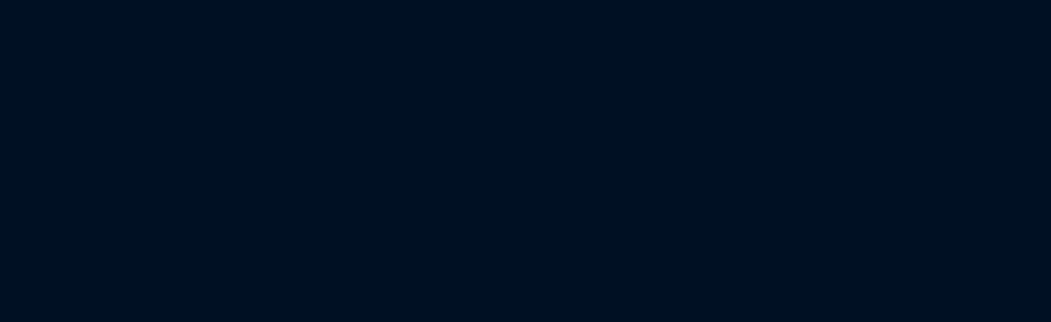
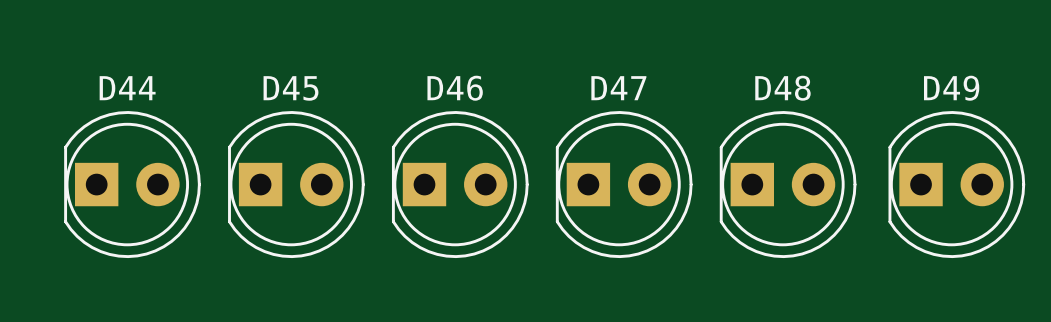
D44: none -> (132, 184)
D45: none -> (296, 184)
D46: none -> (460, 184)
D47: none -> (624, 184)
D48: none -> (788, 184)
D49: none -> (956, 184)

